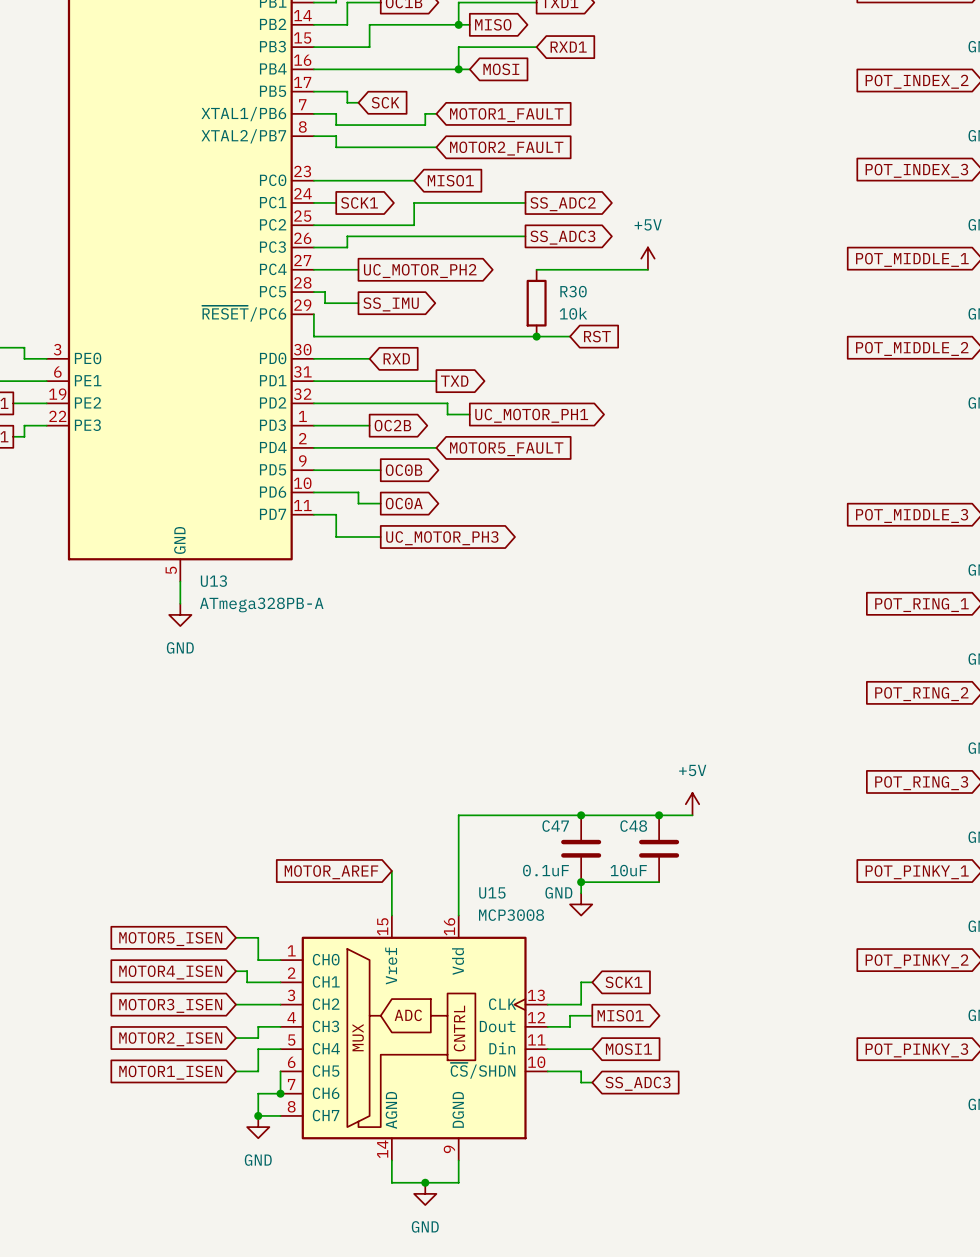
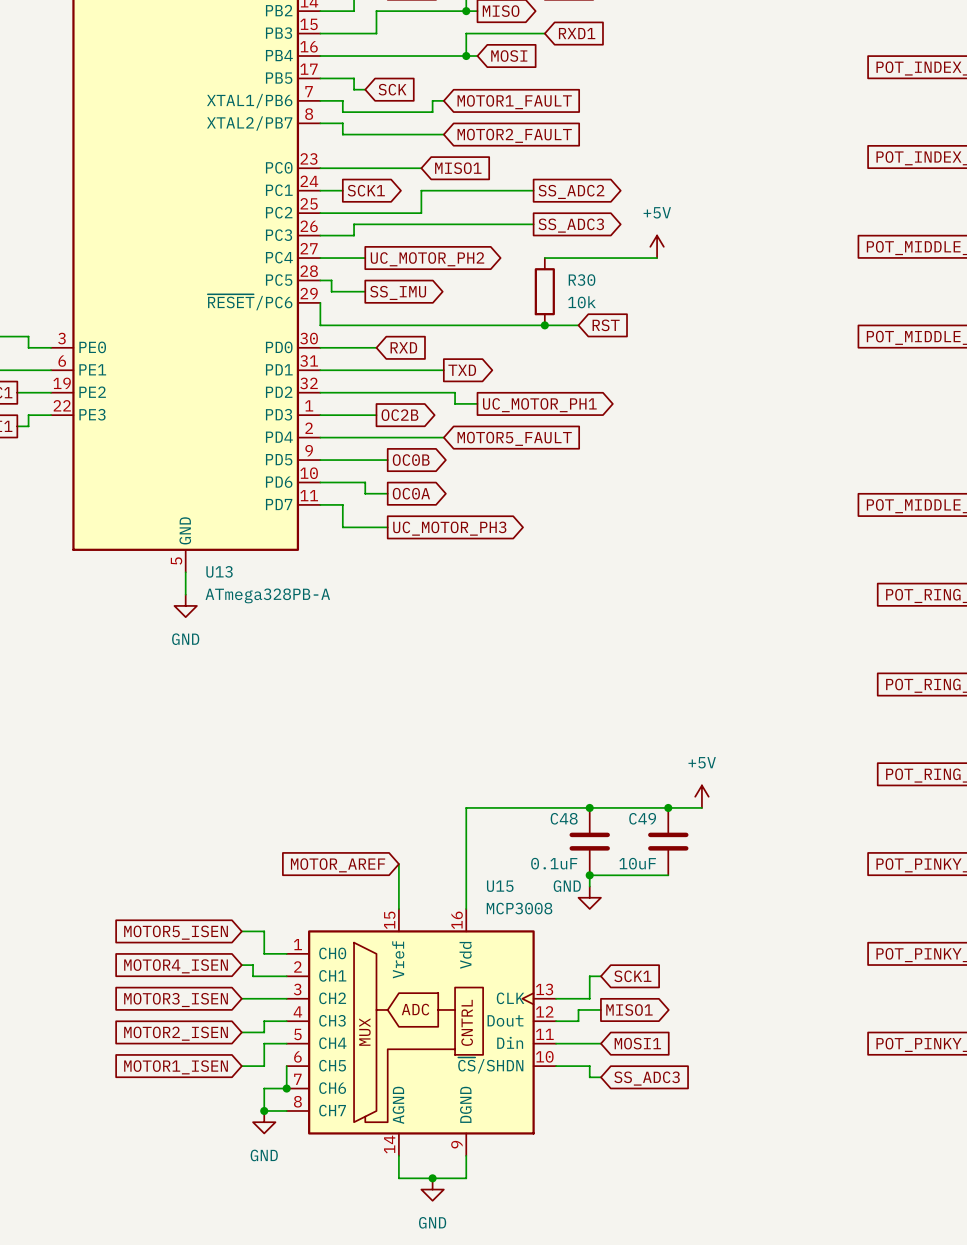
C47 name: C47 (555, 826) -> C48 (564, 818)
C48 name: C48 (633, 826) -> C49 (642, 818)

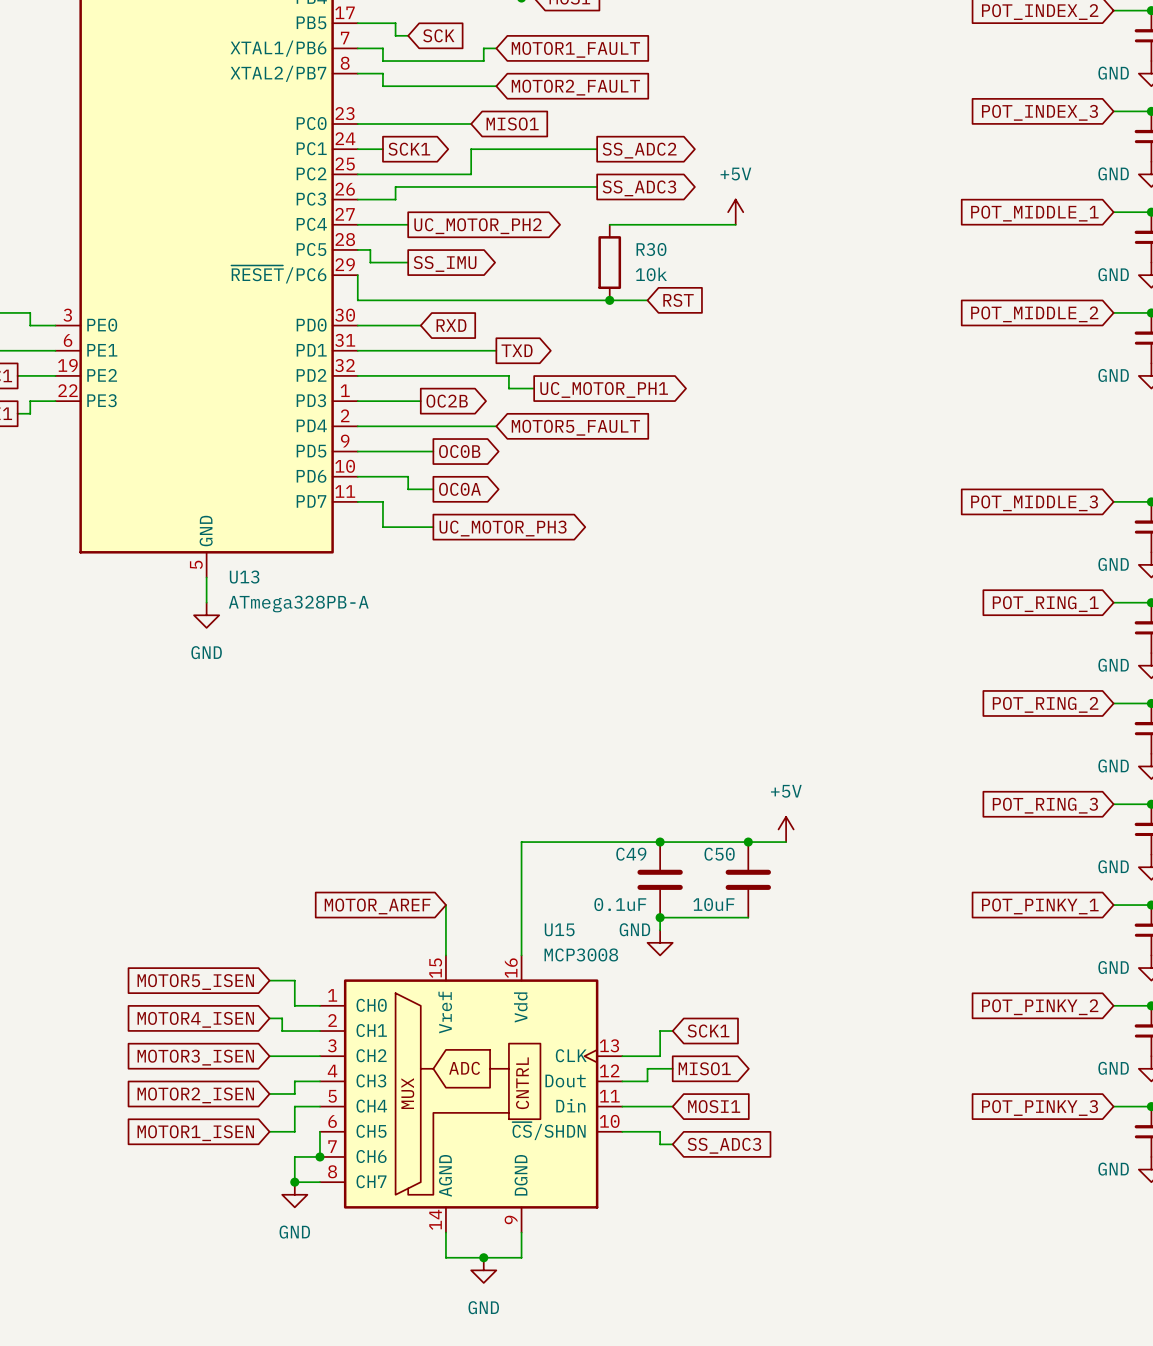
C48 name: C48 (564, 818) -> C49 (631, 854)
C49 name: C49 (642, 818) -> C50 (719, 854)

